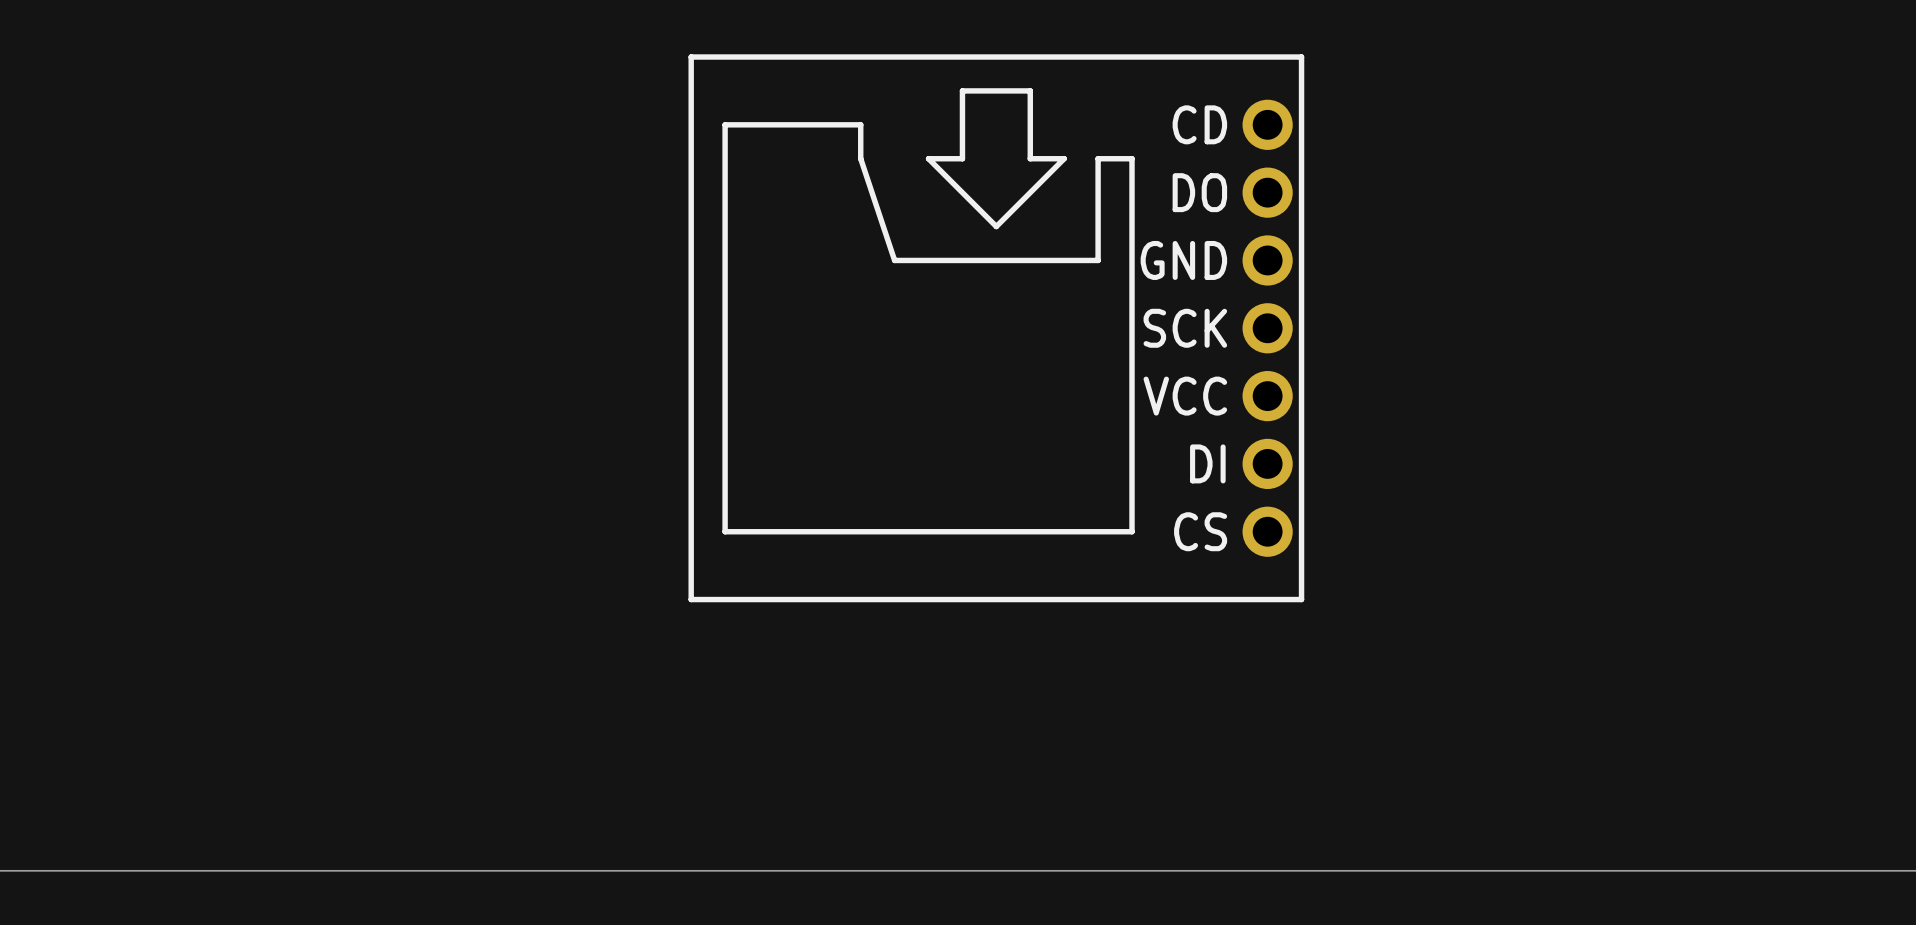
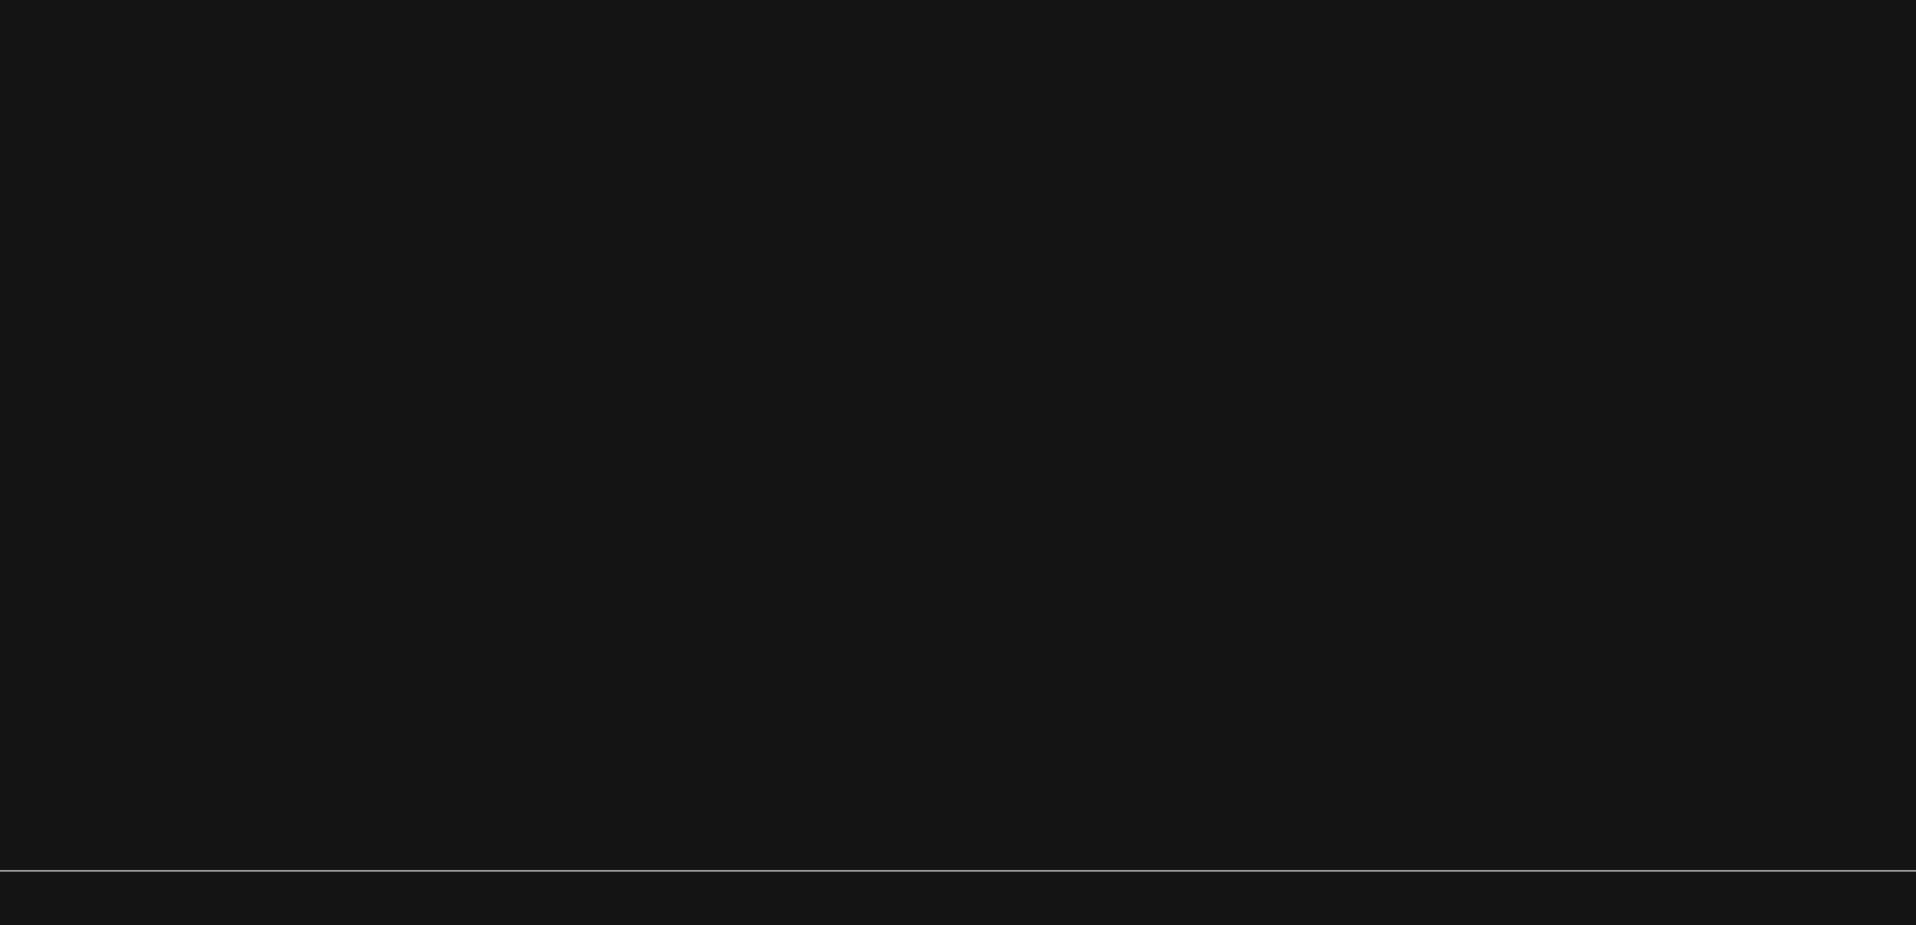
part: (996, 328) -> none

